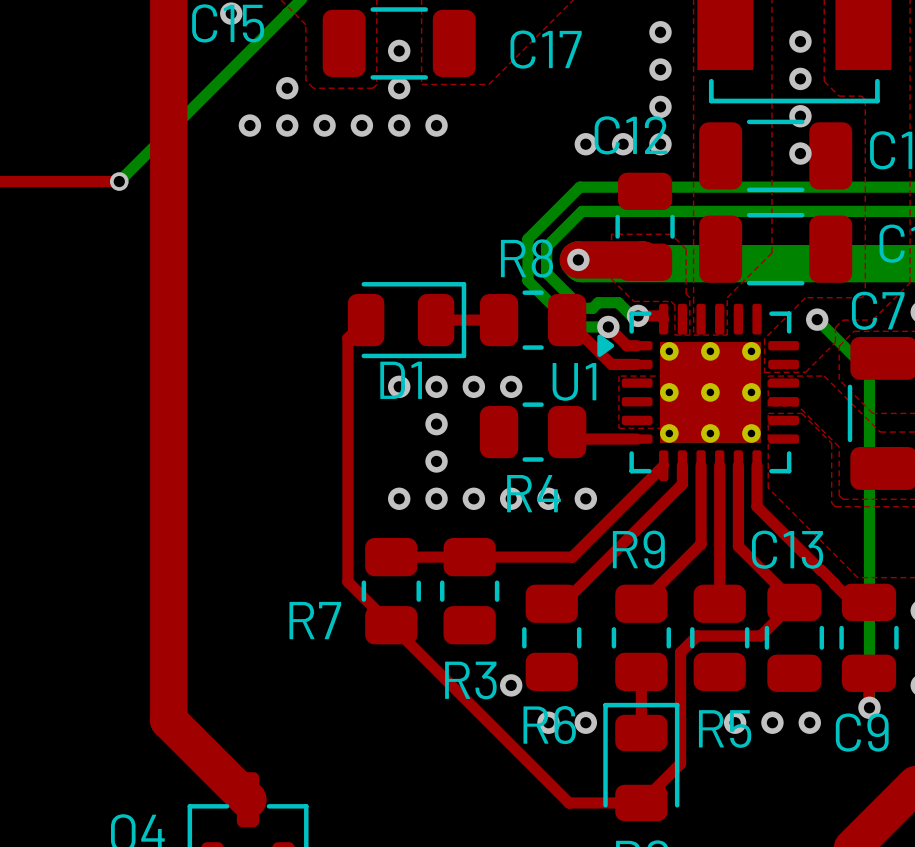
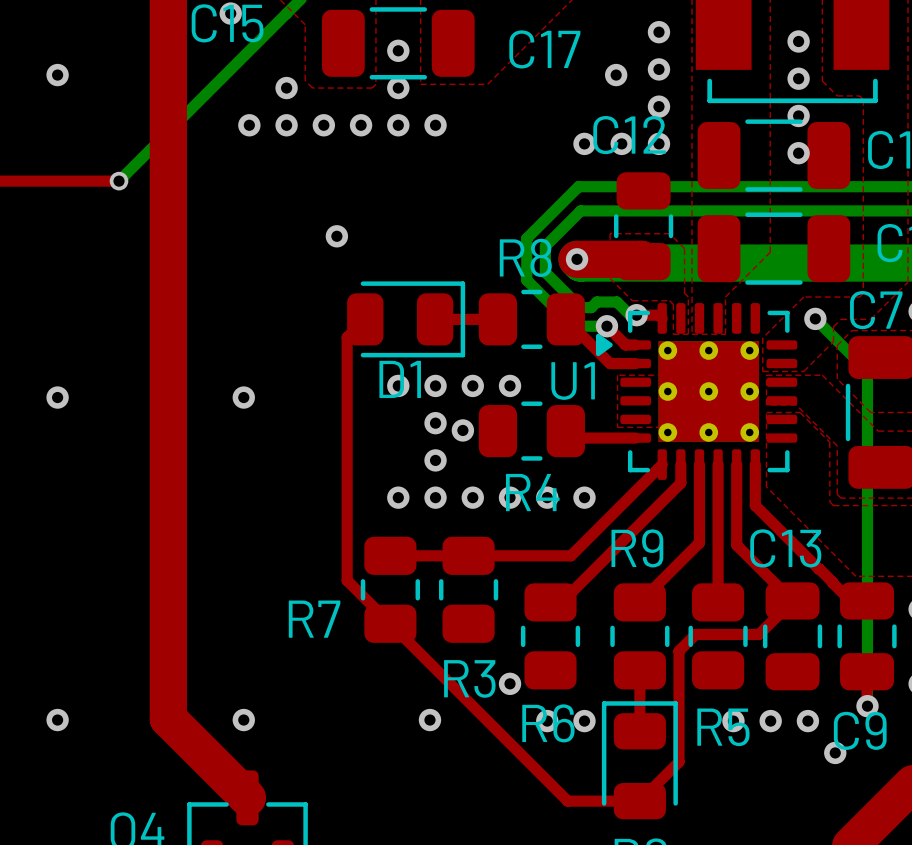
via: none -> (57, 75)
via: none -> (616, 75)
via: none -> (336, 236)
via: none -> (57, 397)
via: none -> (243, 397)
via: none -> (462, 430)
via: none -> (57, 720)
via: none -> (243, 720)
via: none -> (429, 720)
via: none -> (835, 752)

